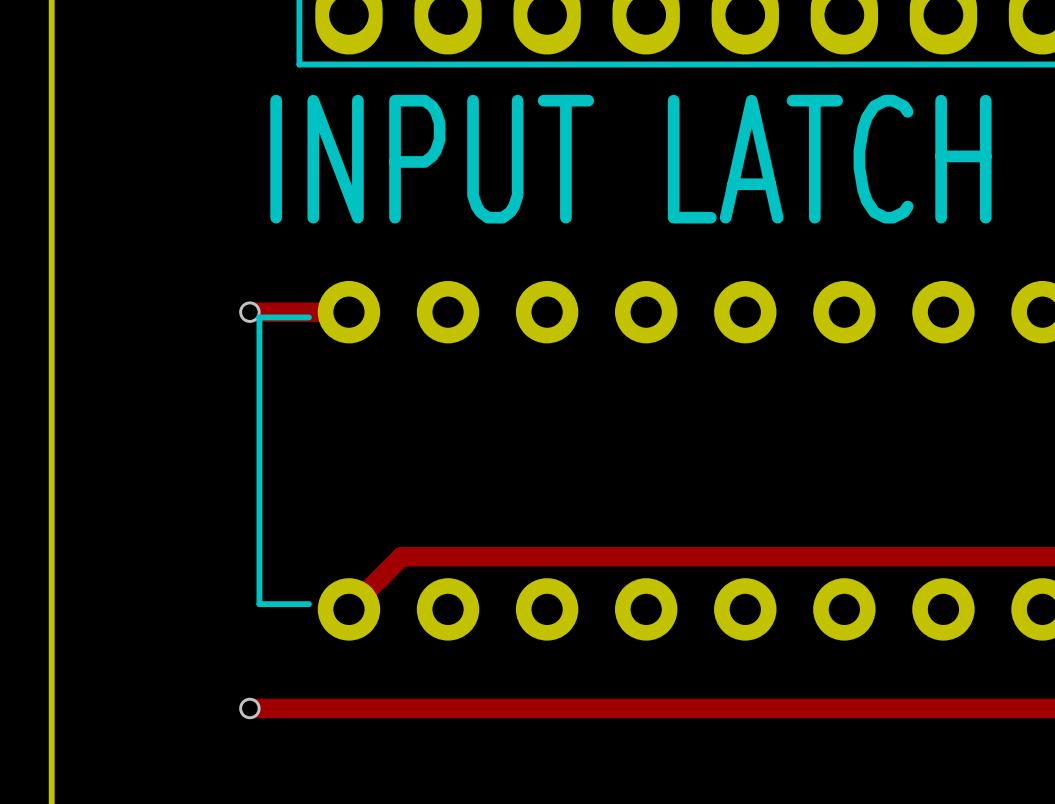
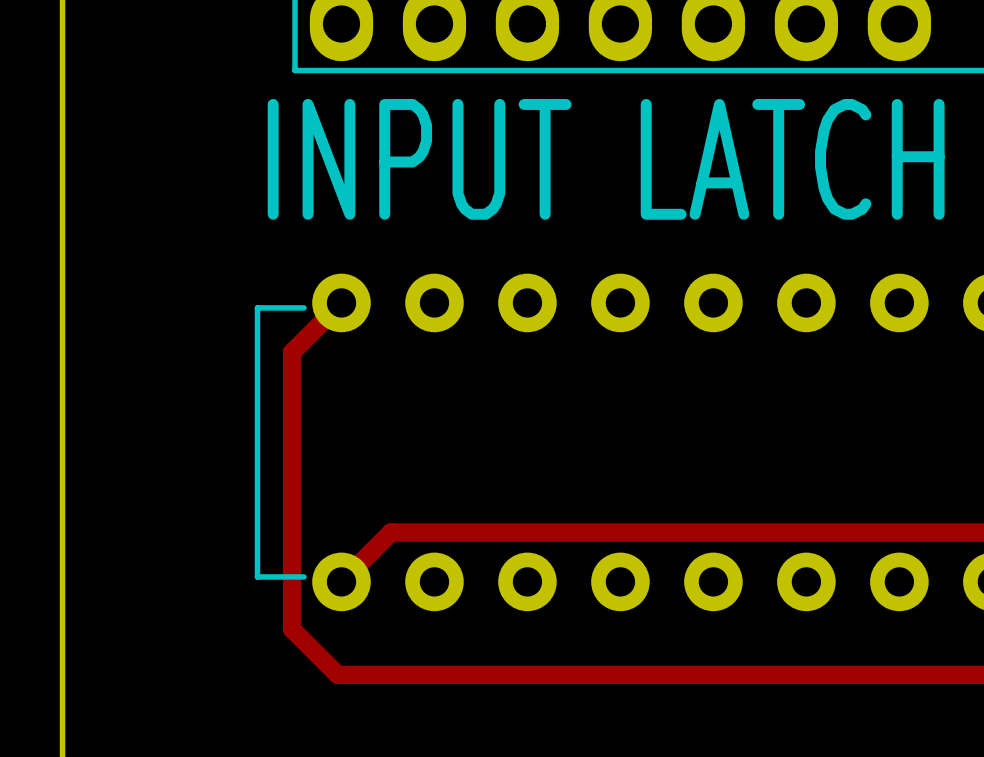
track: (249, 312) (348, 312) -> (337, 674) (292, 629) (292, 352) (341, 302)
via: (249, 312) -> none
track: (249, 708) (345, 708) -> none
via: (249, 708) -> none

